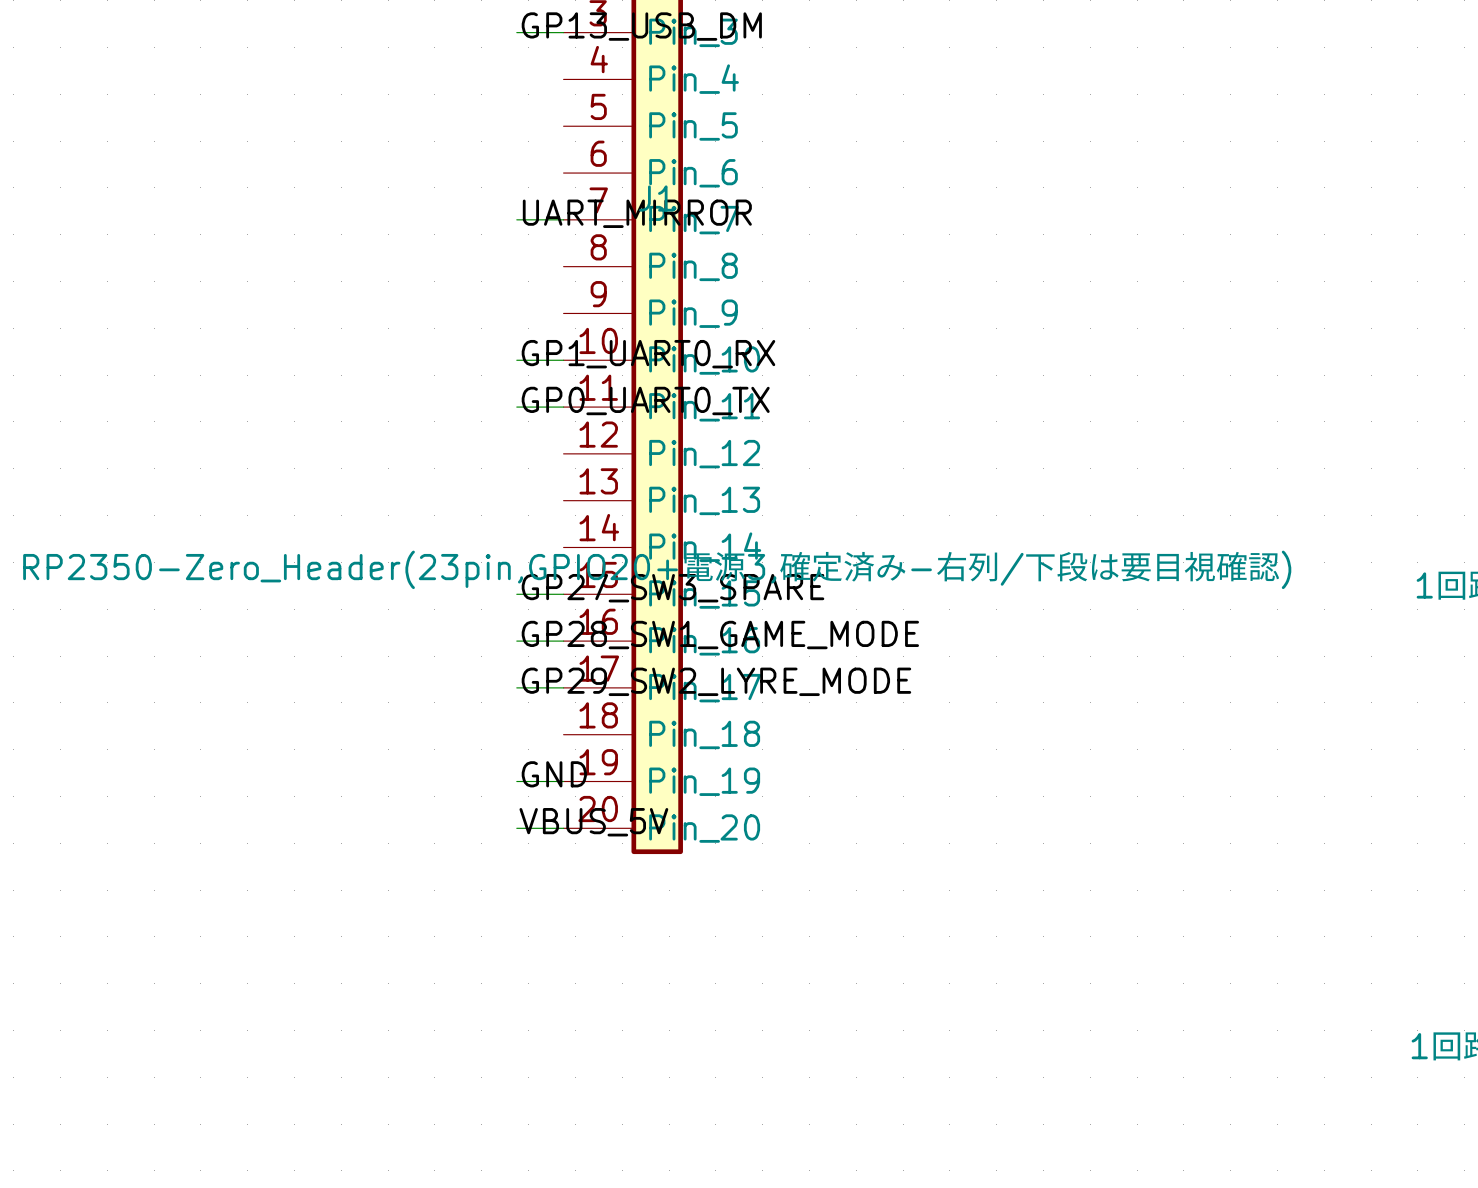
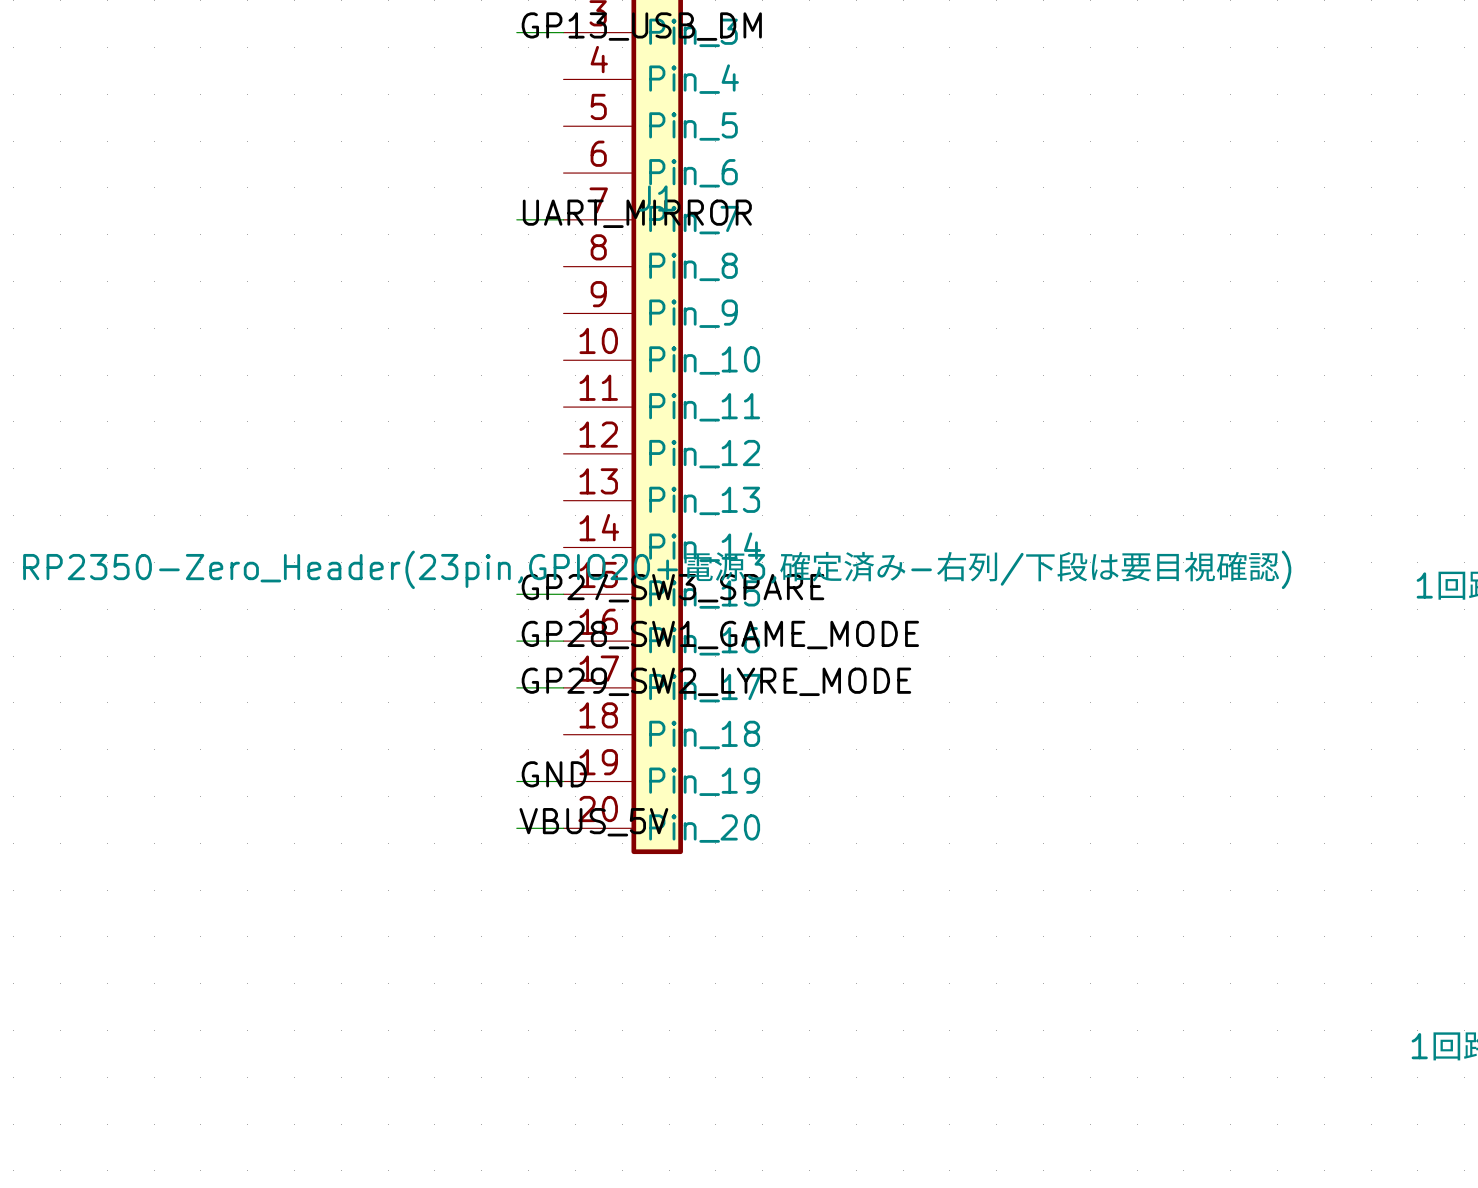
label: GP1_UART0_RX (648, 354) -> none
wire: (516, 360) (563, 360) -> none
label: GP0_UART0_TX (645, 400) -> none
wire: (516, 407) (563, 407) -> none

